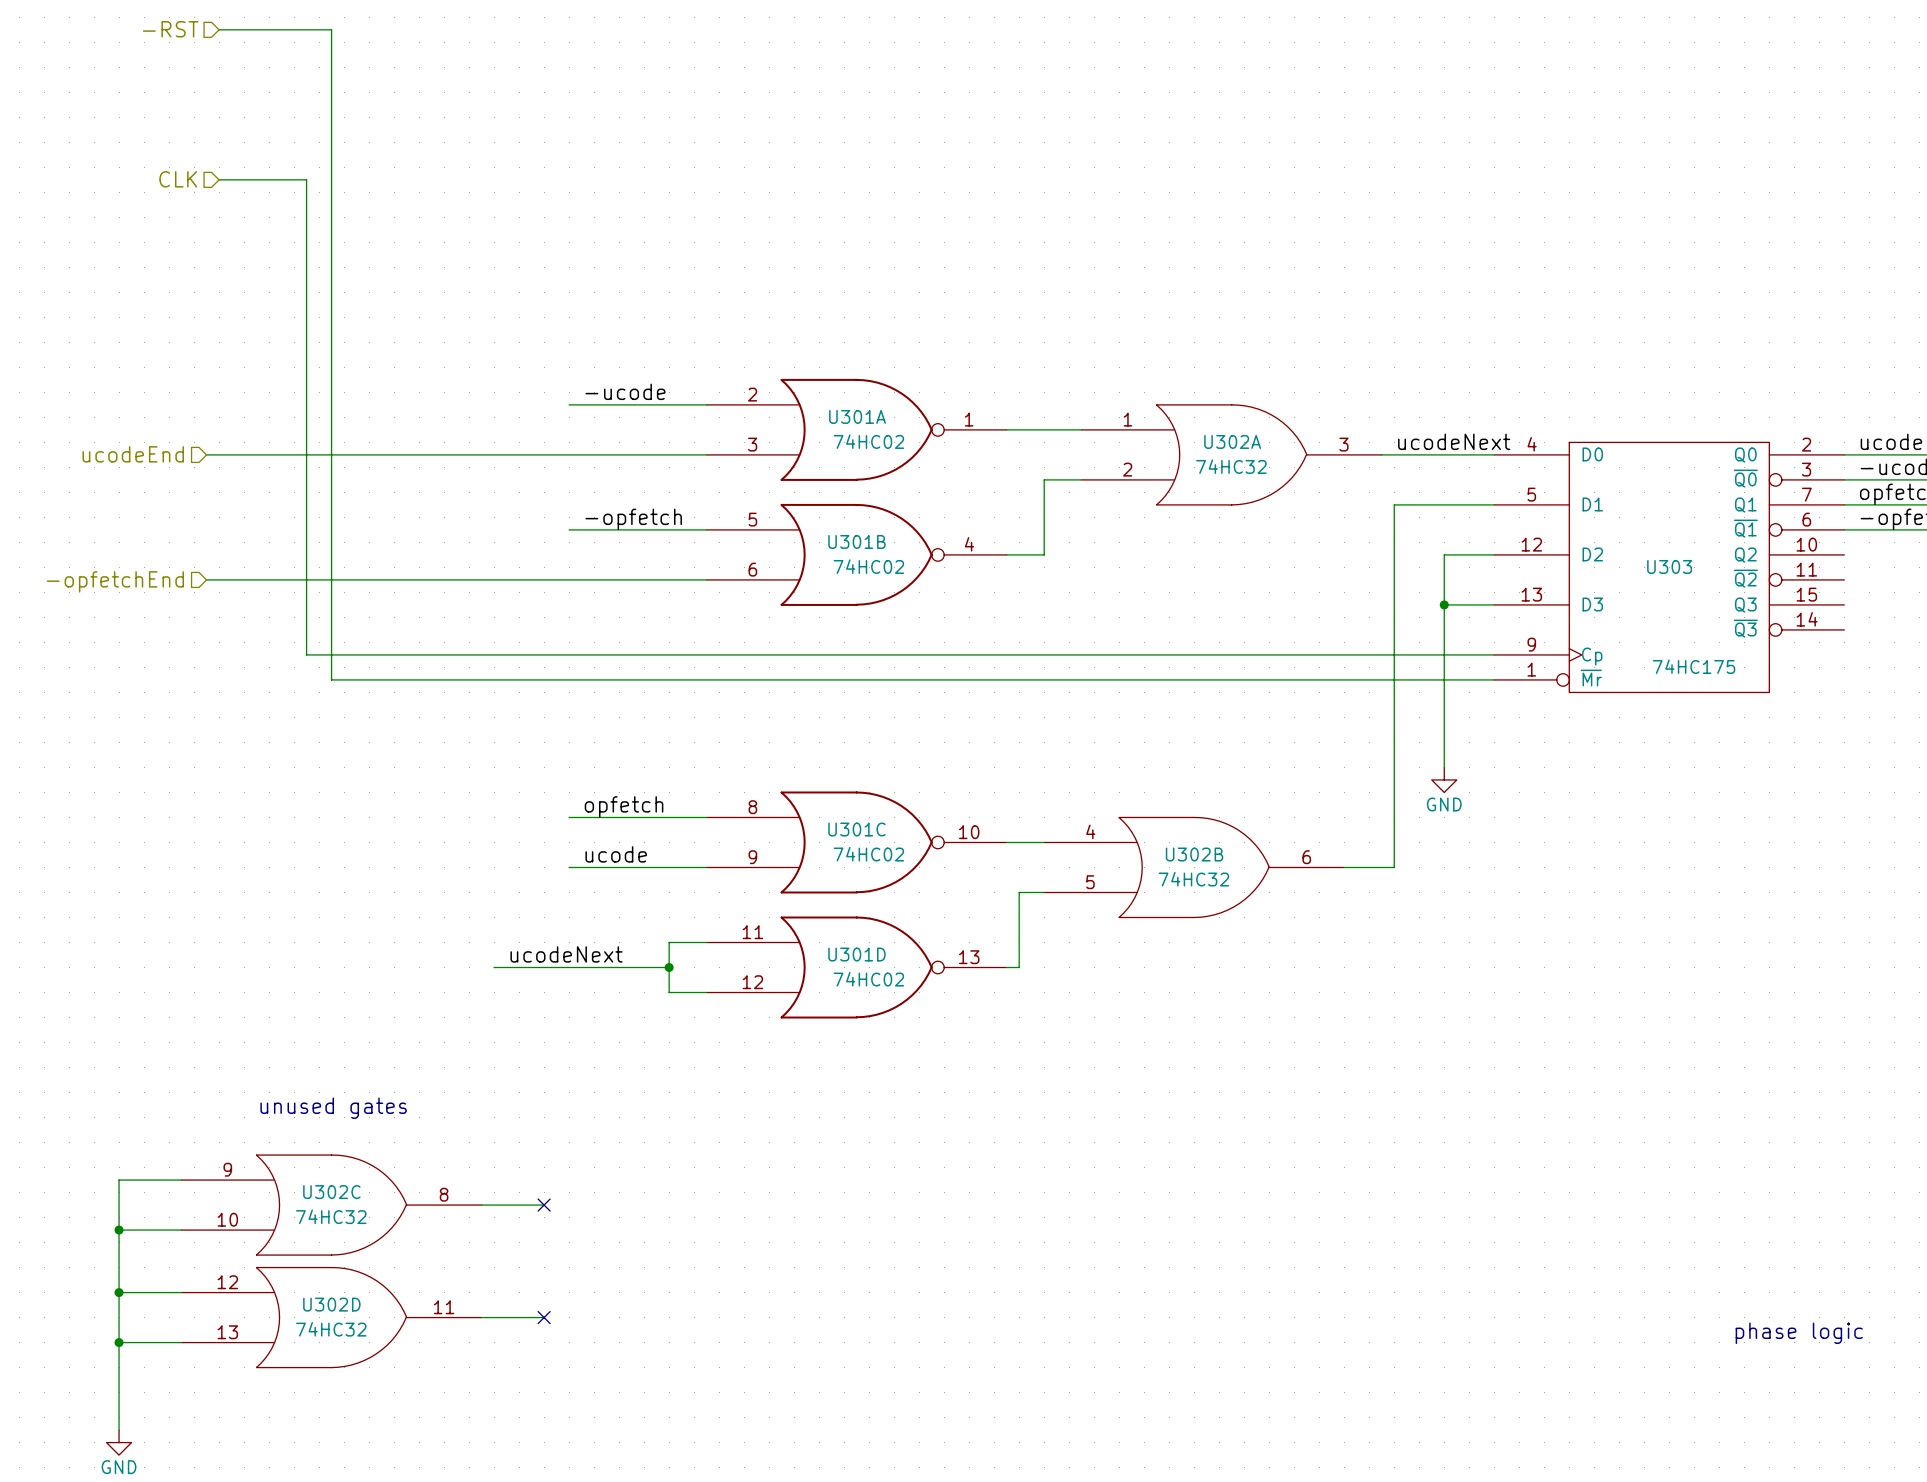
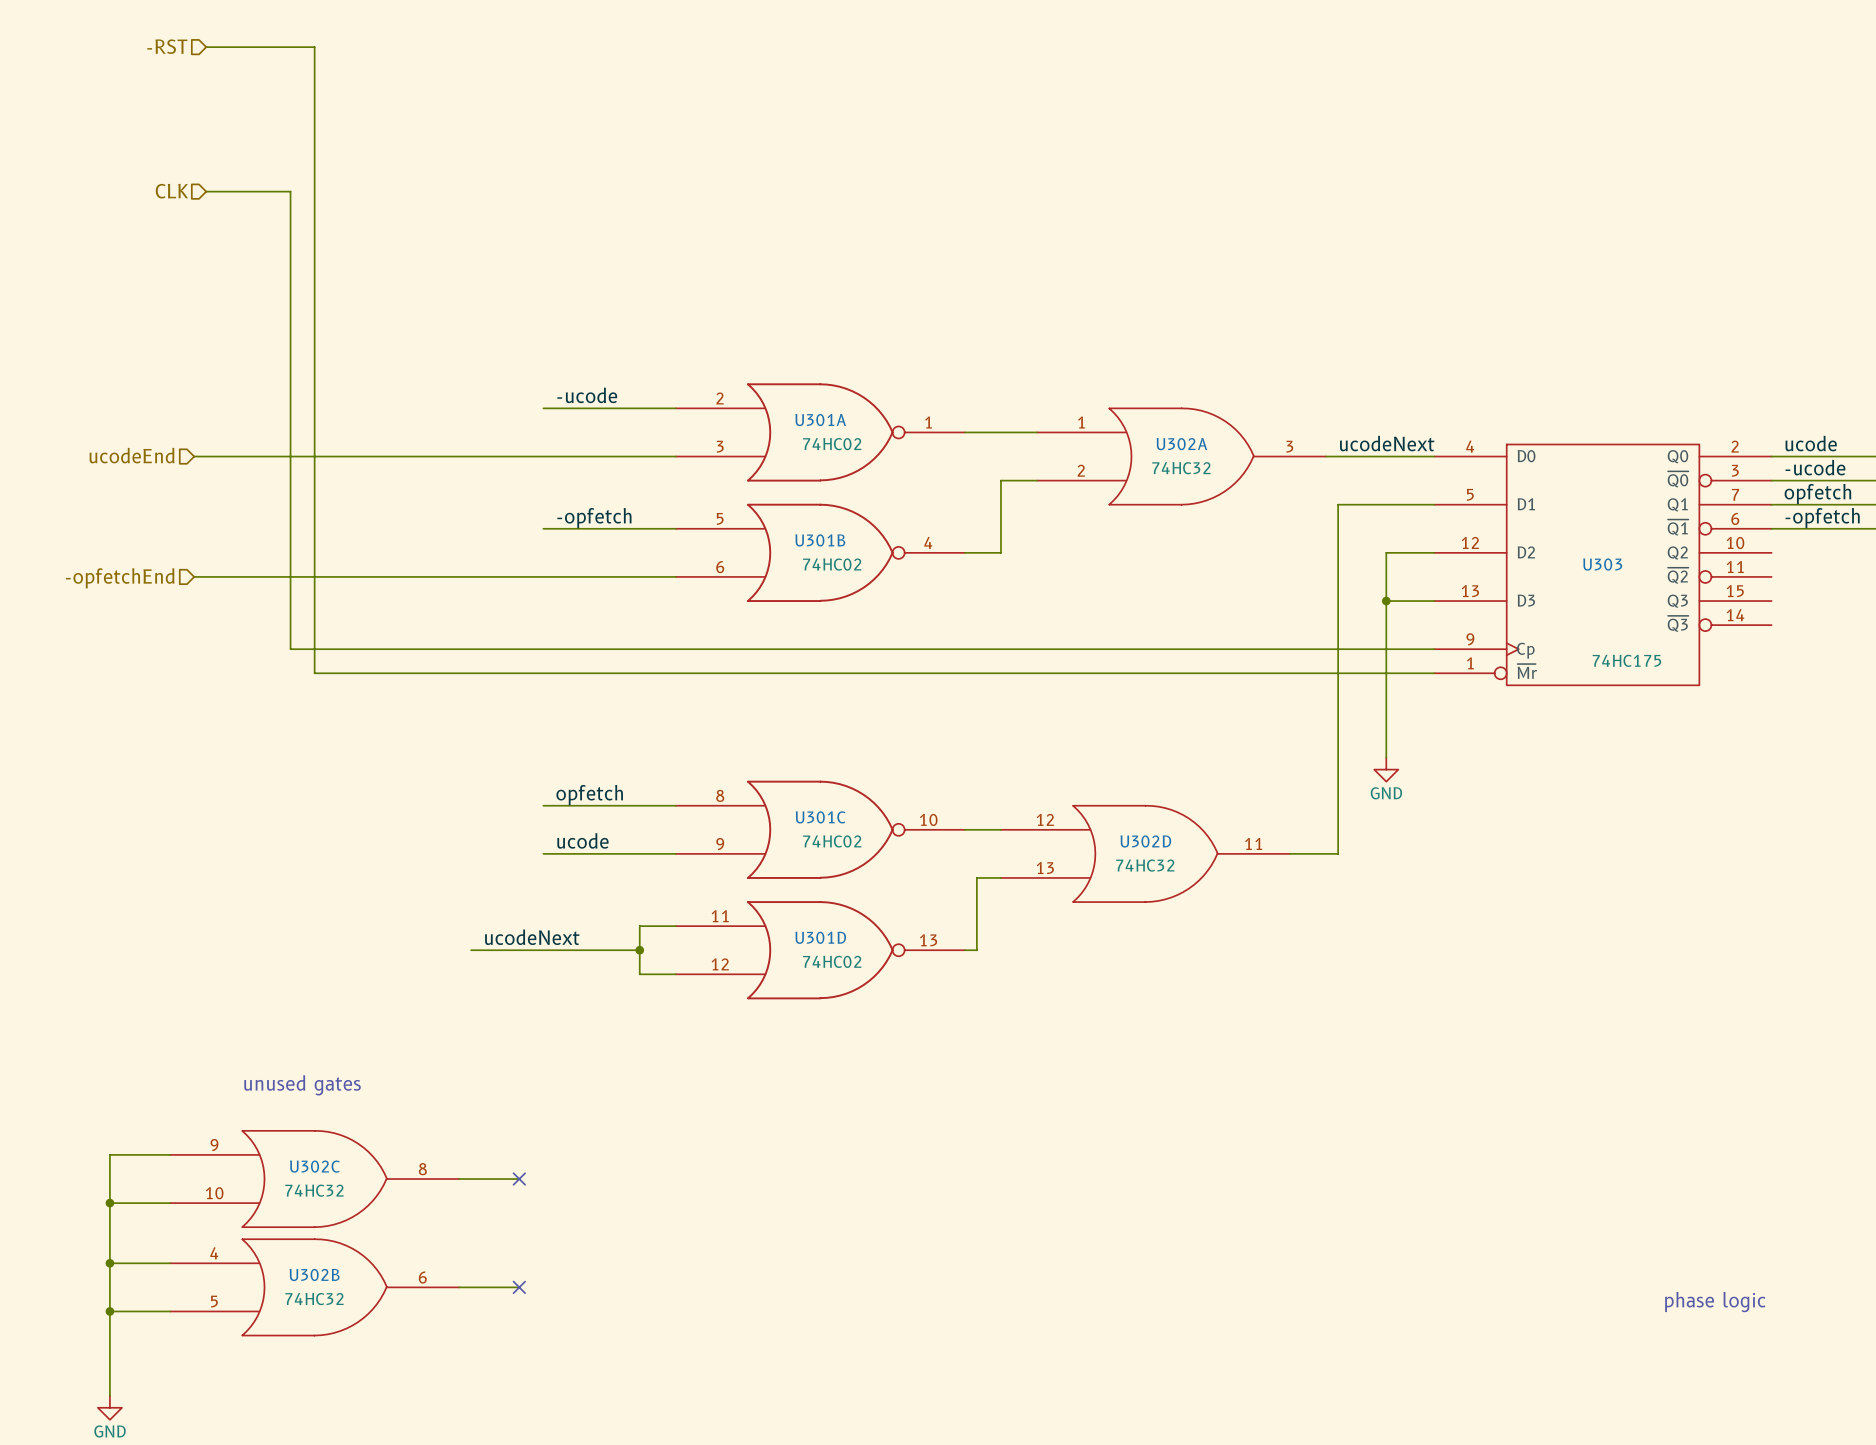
U302B position: (1194, 867) -> (314, 1287)
U302D position: (331, 1317) -> (1145, 853)

